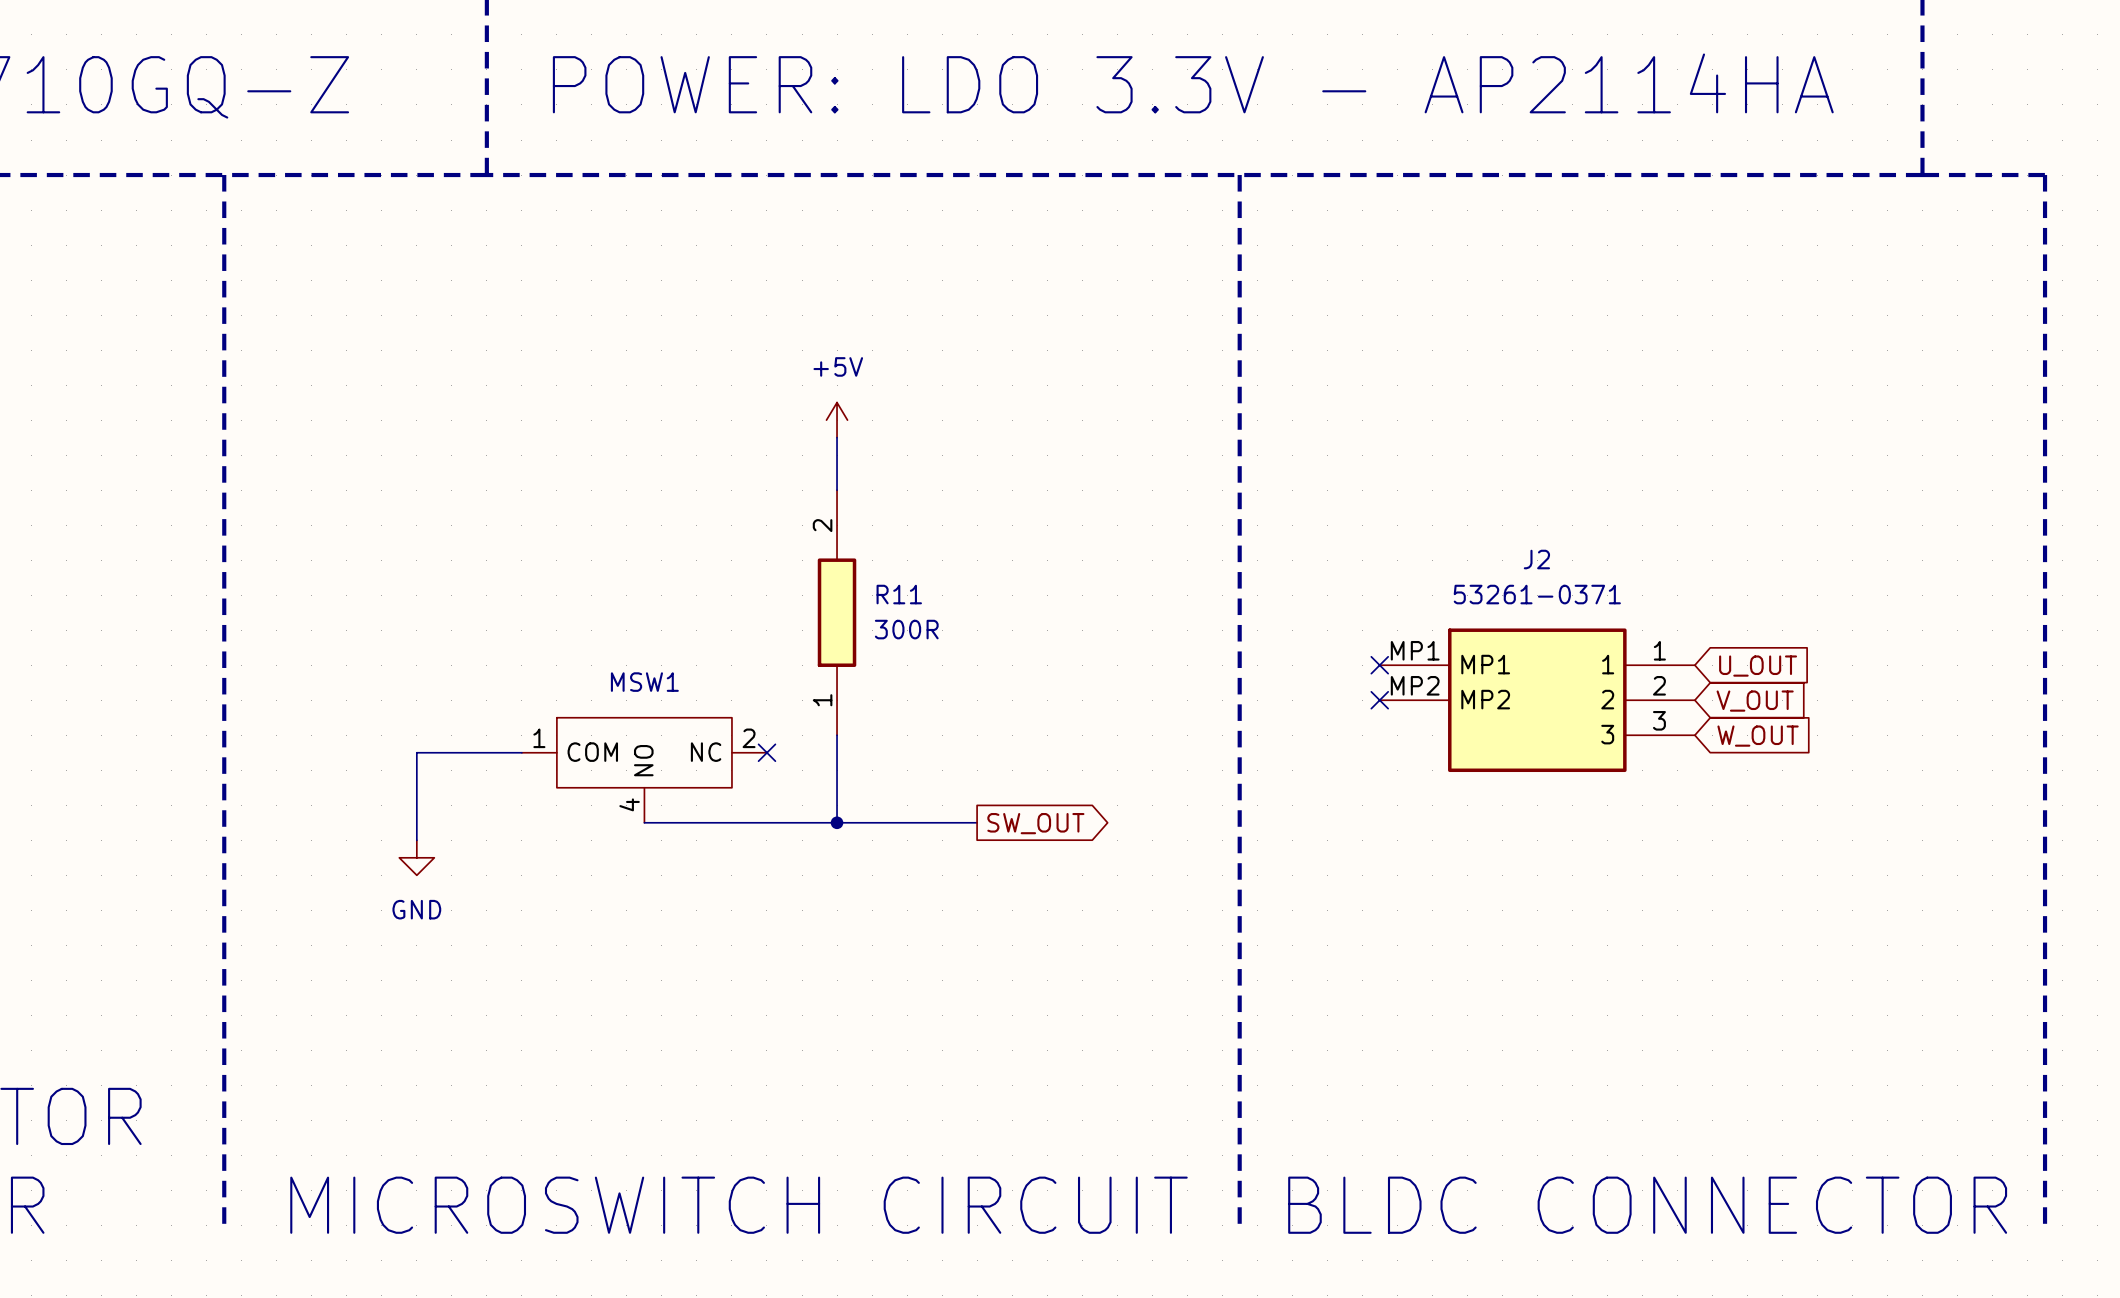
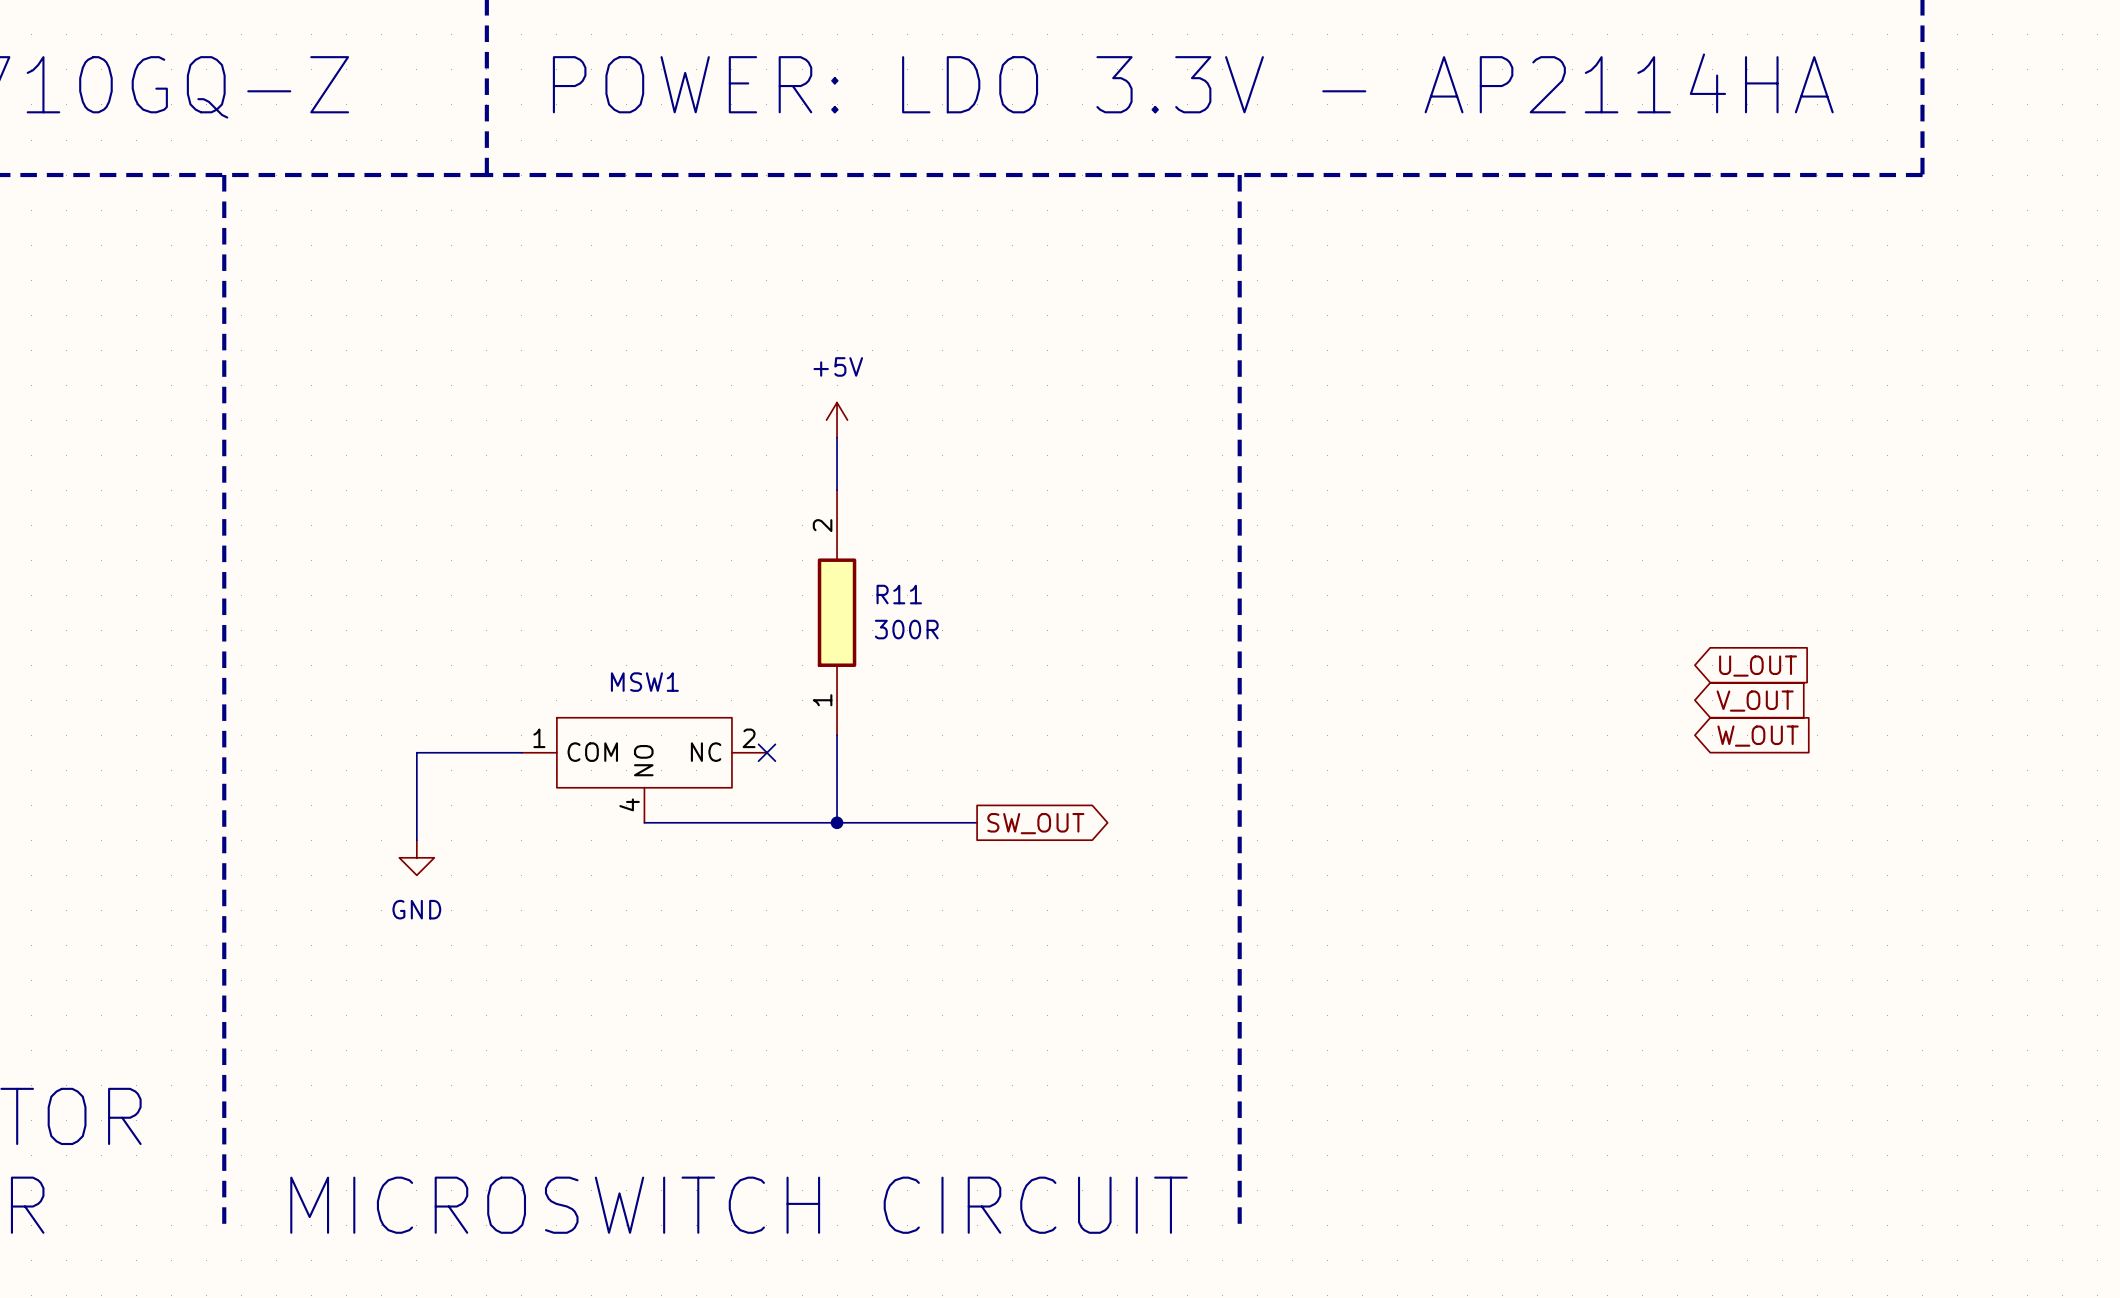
line: (1922, 175) (2045, 175) (2045, 1225) -> none
no-connect mark: (1379, 665) -> none
no-connect mark: (1379, 700) -> none
J2: 53261-0371 (1537, 700) -> none
text: BLDC CONNECTOR (1647, 1205) -> none

